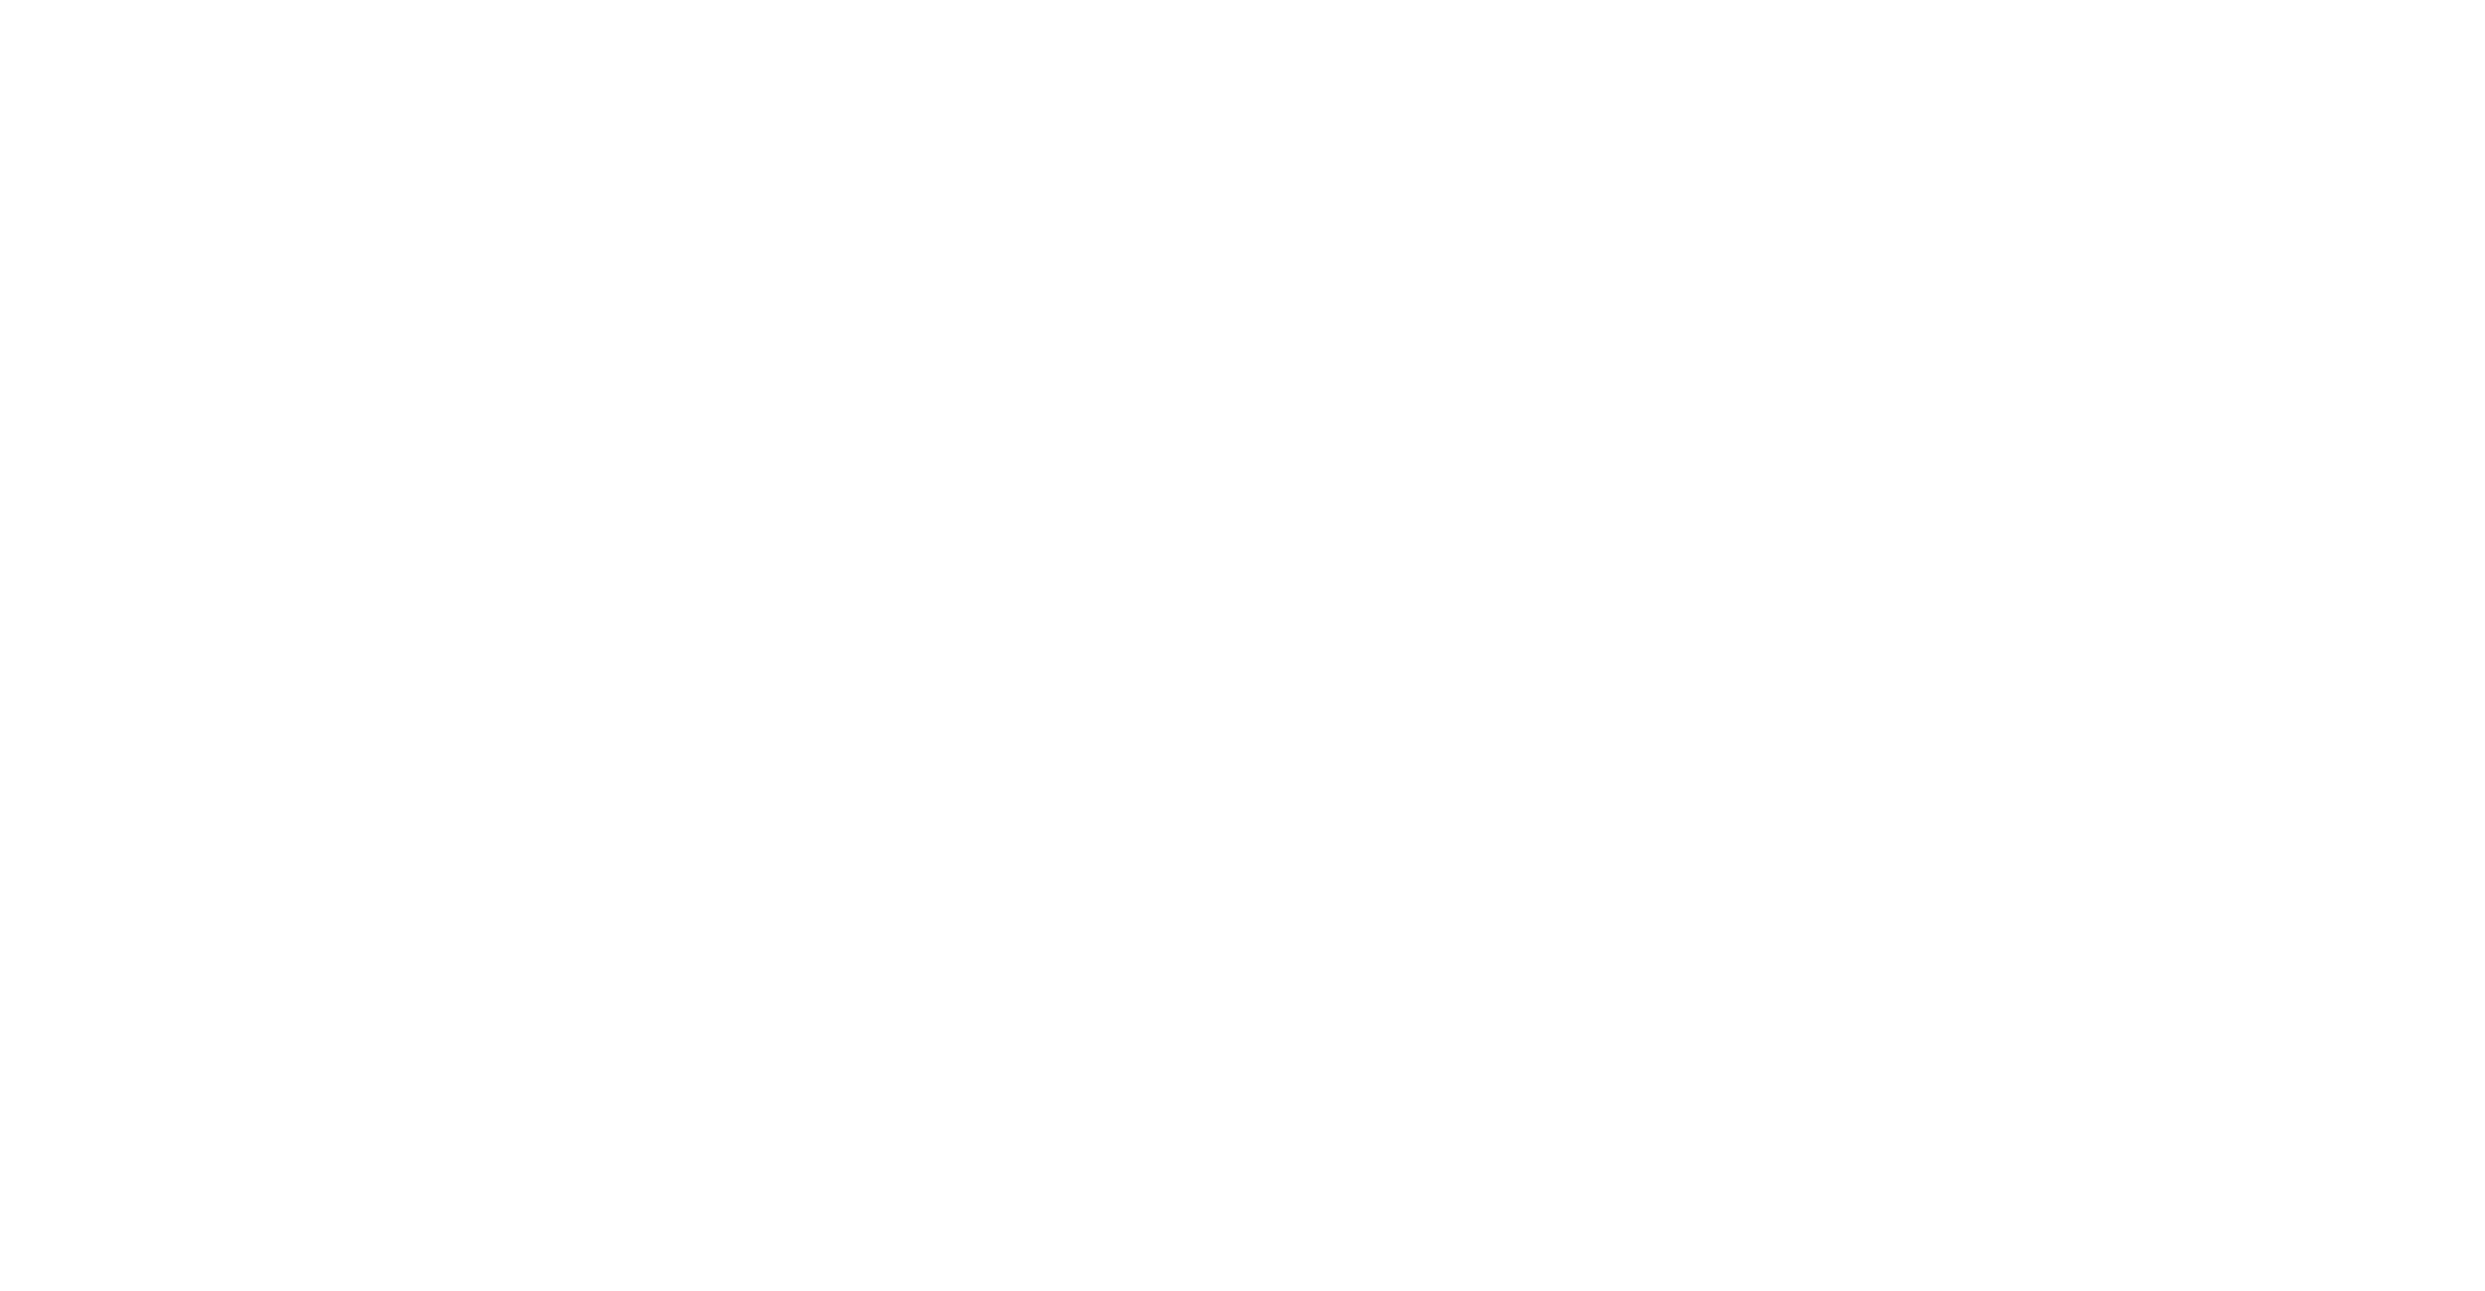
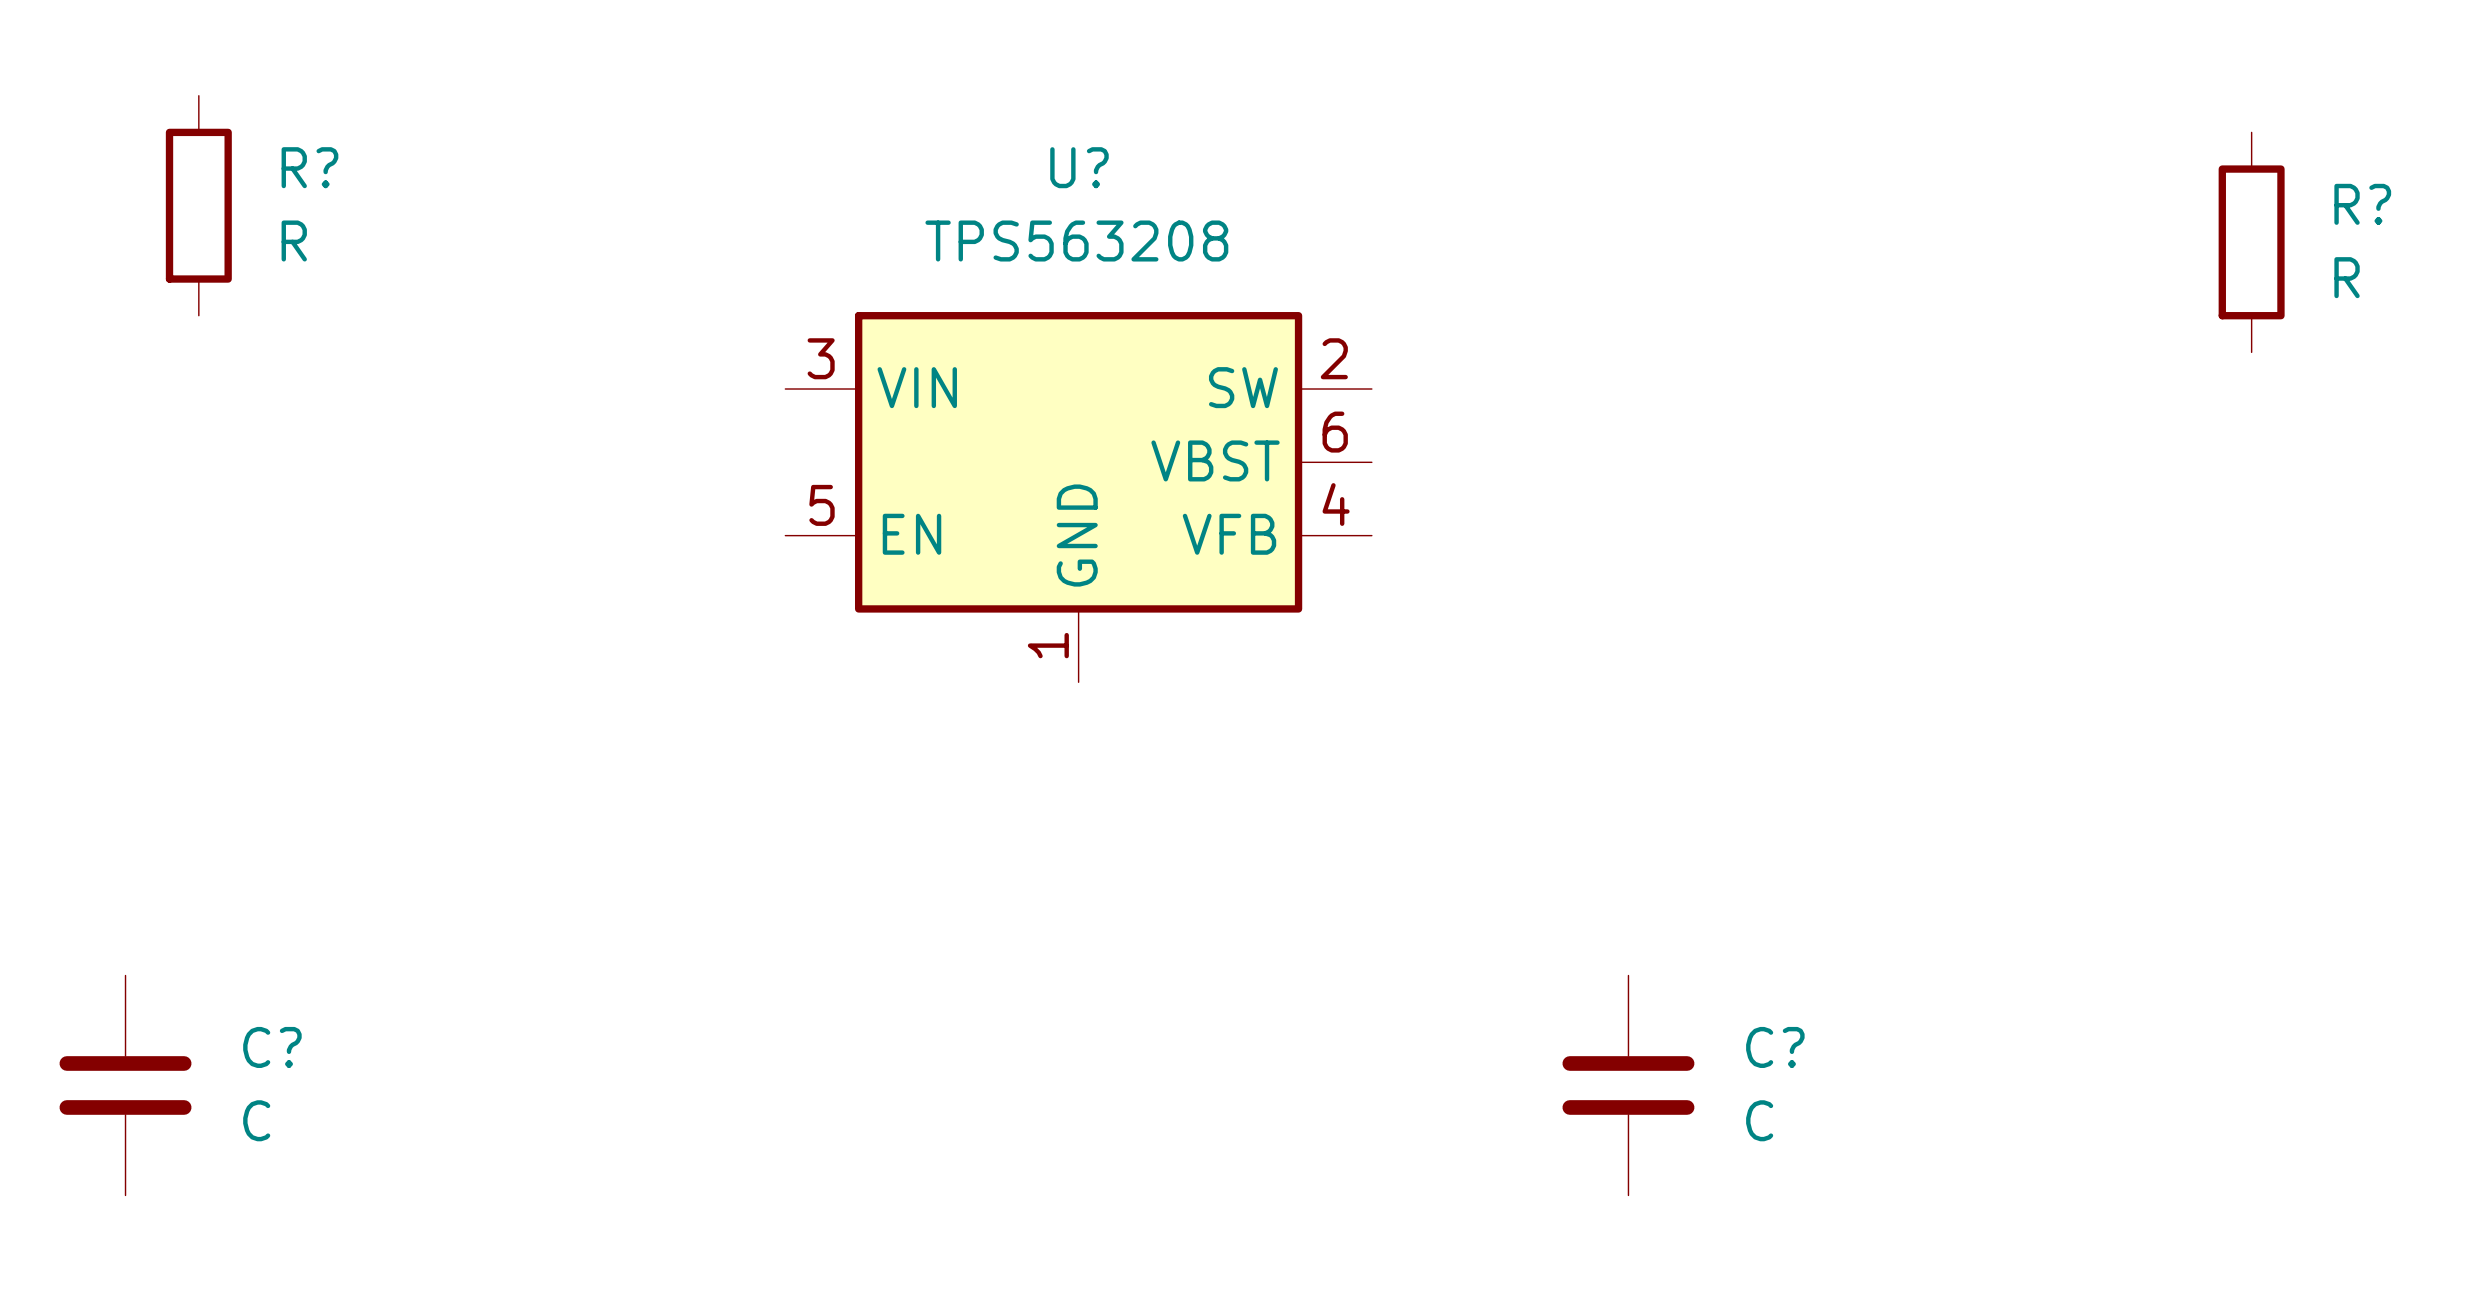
R?: none -> R (198, 205)
R?: none -> R (2251, 242)
U?: none -> TPS563208 (1078, 497)
C?: none -> C (125, 1085)
C?: none -> C (1628, 1085)

